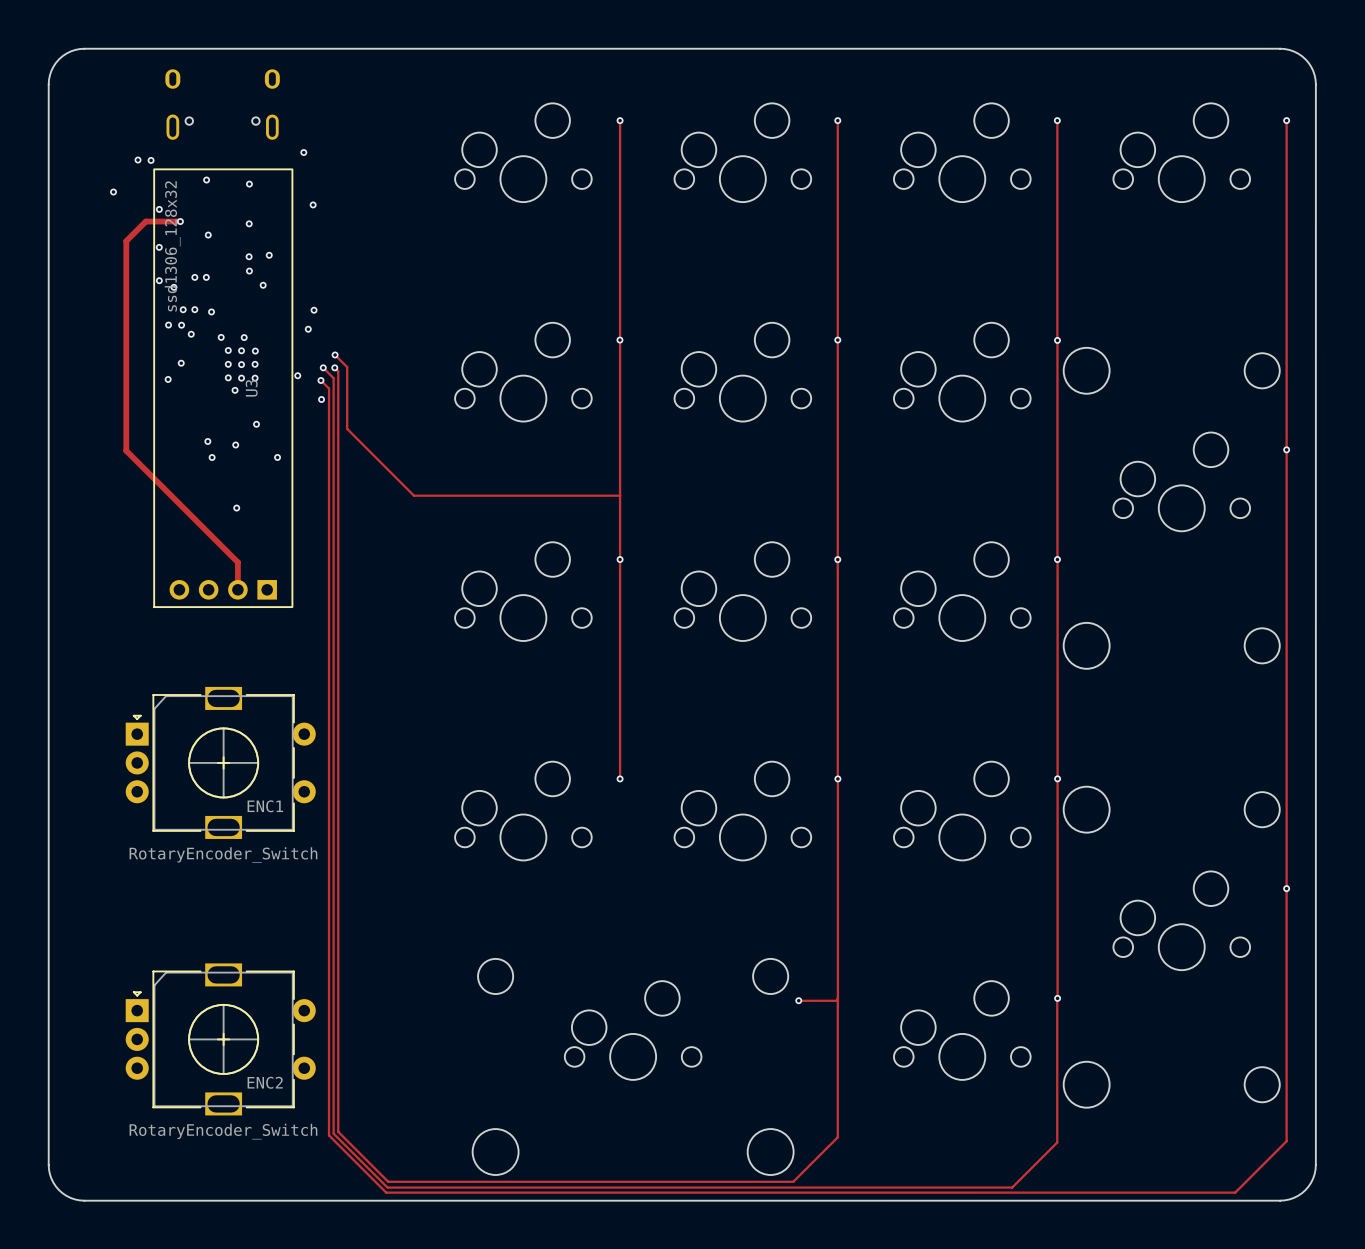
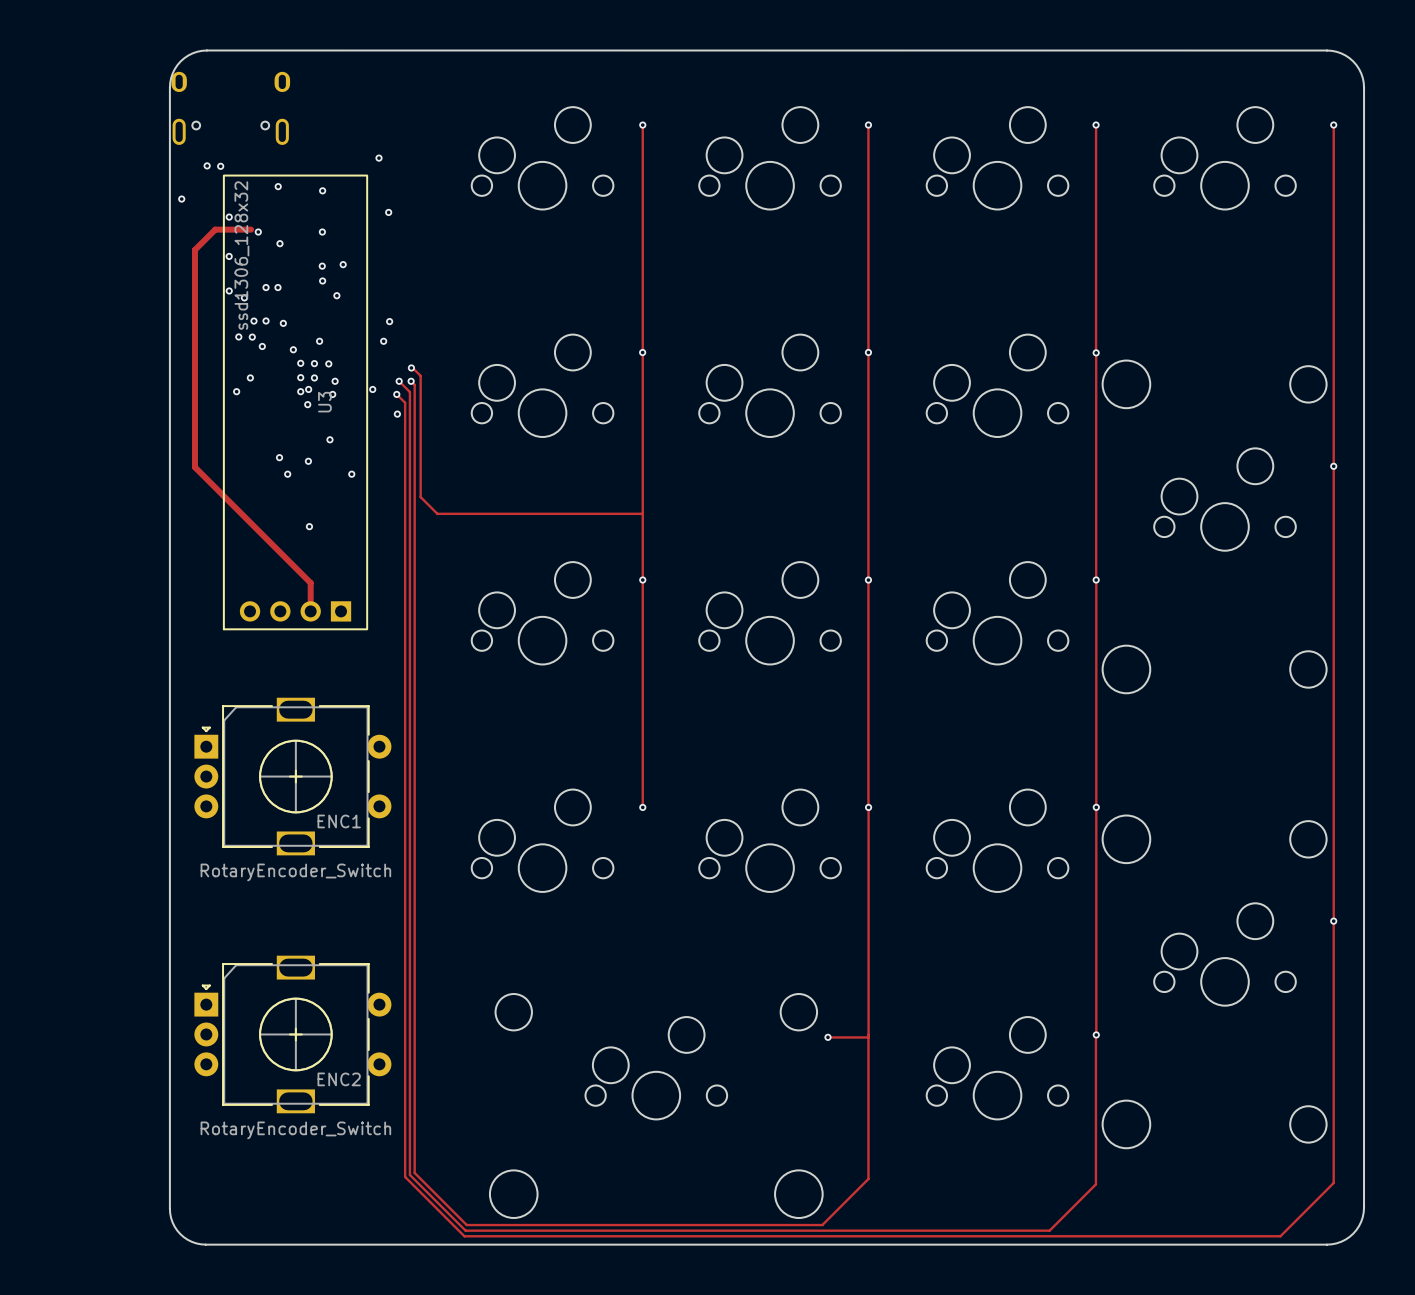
board edge: (1280, 48) (84, 48) (70, 51) (59, 59) (51, 70) (48, 84) (49, 1169) (51, 1178) (59, 1190) (75, 1199) (198, 1200) -> (1327, 50) (206, 50) (192, 53) (180, 61) (172, 73) (169, 87) (169, 1208) (172, 1222) (180, 1234) (192, 1241) (205, 1244)
via: (303, 152) -> none
via: none -> (378, 158)
via: (138, 160) -> none
via: (151, 160) -> none
via: none -> (207, 165)
via: none -> (220, 166)
via: (206, 180) -> none
via: none -> (278, 186)
via: (249, 184) -> none
via: none -> (322, 190)
via: (113, 192) -> none
via: none -> (181, 199)
via: (313, 204) -> none
via: none -> (388, 212)
via: (159, 209) -> none
via: none -> (229, 217)
track: (180, 221) (145, 221) (126, 241) (126, 450) (237, 562) (237, 589) -> (251, 229) (215, 229) (194, 249) (194, 467) (310, 582) (310, 611)
via: (180, 221) -> none
via: none -> (322, 232)
via: (208, 235) -> none
via: none -> (279, 243)
via: (159, 247) -> none
via: none -> (229, 256)
via: (269, 255) -> none
via: none -> (343, 264)
via: (249, 256) -> none
via: none -> (322, 266)
via: (249, 271) -> none
via: none -> (322, 280)
via: (194, 277) -> none
via: (206, 277) -> none
via: none -> (266, 287)
via: none -> (277, 287)
via: (159, 280) -> none
via: none -> (229, 290)
via: (263, 285) -> none
via: none -> (336, 295)
via: (173, 287) -> none
via: none -> (244, 297)
via: (183, 309) -> none
via: (194, 309) -> none
via: none -> (253, 321)
via: none -> (266, 320)
via: (314, 310) -> none
via: none -> (389, 321)
via: (211, 311) -> none
via: none -> (283, 323)
via: (168, 325) -> none
via: (181, 325) -> none
via: none -> (238, 336)
via: none -> (252, 337)
via: none -> (383, 341)
via: (191, 334) -> none
via: none -> (262, 346)
via: (221, 337) -> none
via: (244, 337) -> none
via: none -> (293, 349)
via: (228, 350) -> none
via: (241, 350) -> none
via: none -> (300, 363)
via: none -> (314, 363)
via: (255, 351) -> none
via: none -> (328, 363)
via: (335, 354) -> none
track: (336, 354) (347, 367) (347, 428) (413, 495) (421, 495) -> (411, 367) (420, 375) (420, 497) (437, 513)
via: none -> (411, 367)
via: (181, 363) -> none
via: (228, 364) -> none
via: (255, 364) -> none
via: none -> (300, 377)
via: none -> (314, 377)
track: (323, 367) (333, 378) (333, 1133) (387, 1187) (1012, 1187) -> (399, 381) (409, 392) (409, 1174) (465, 1230) (1049, 1230)
track: (334, 367) (338, 371) (338, 1131) (388, 1181) (450, 1181) -> (411, 381) (414, 384) (414, 1172) (466, 1225)
via: (334, 367) -> none
via: none -> (399, 381)
via: none -> (411, 381)
via: none -> (372, 389)
via: none -> (300, 391)
via: (241, 378) -> none
via: (255, 378) -> none
via: (168, 379) -> none
track: (320, 380) (329, 388) (329, 1135) (386, 1192) (448, 1192) -> (396, 394) (405, 402) (405, 1176) (464, 1236)
via: none -> (396, 394)
U3 position: (223, 388) -> (295, 402)
via: (235, 390) -> none
via: none -> (307, 404)
via: (321, 399) -> none
via: none -> (397, 414)
via: (256, 424) -> none
via: none -> (329, 439)
via: (207, 441) -> none
via: none -> (279, 457)
via: (235, 445) -> none
via: none -> (308, 461)
via: (212, 457) -> none
via: none -> (351, 474)
via: (236, 508) -> none
via: none -> (309, 526)
ENC1 position: (220, 762) -> (292, 776)
ENC2 position: (220, 1039) -> (292, 1034)

